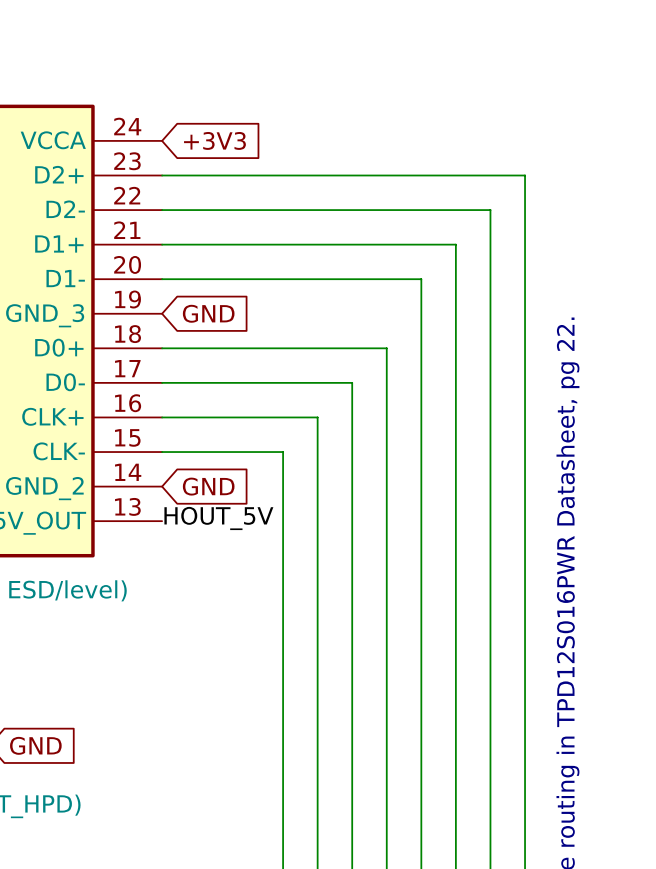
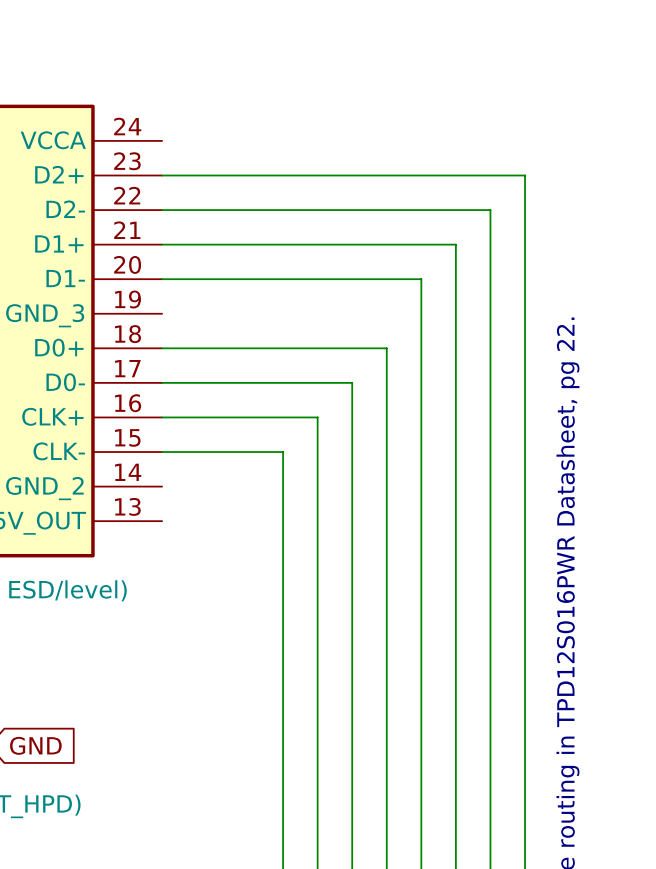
global label: +3V3 (214, 140) -> none
global label: GND (208, 313) -> none
global label: GND (208, 486) -> none
label: HOUT_5V (218, 518) -> none

